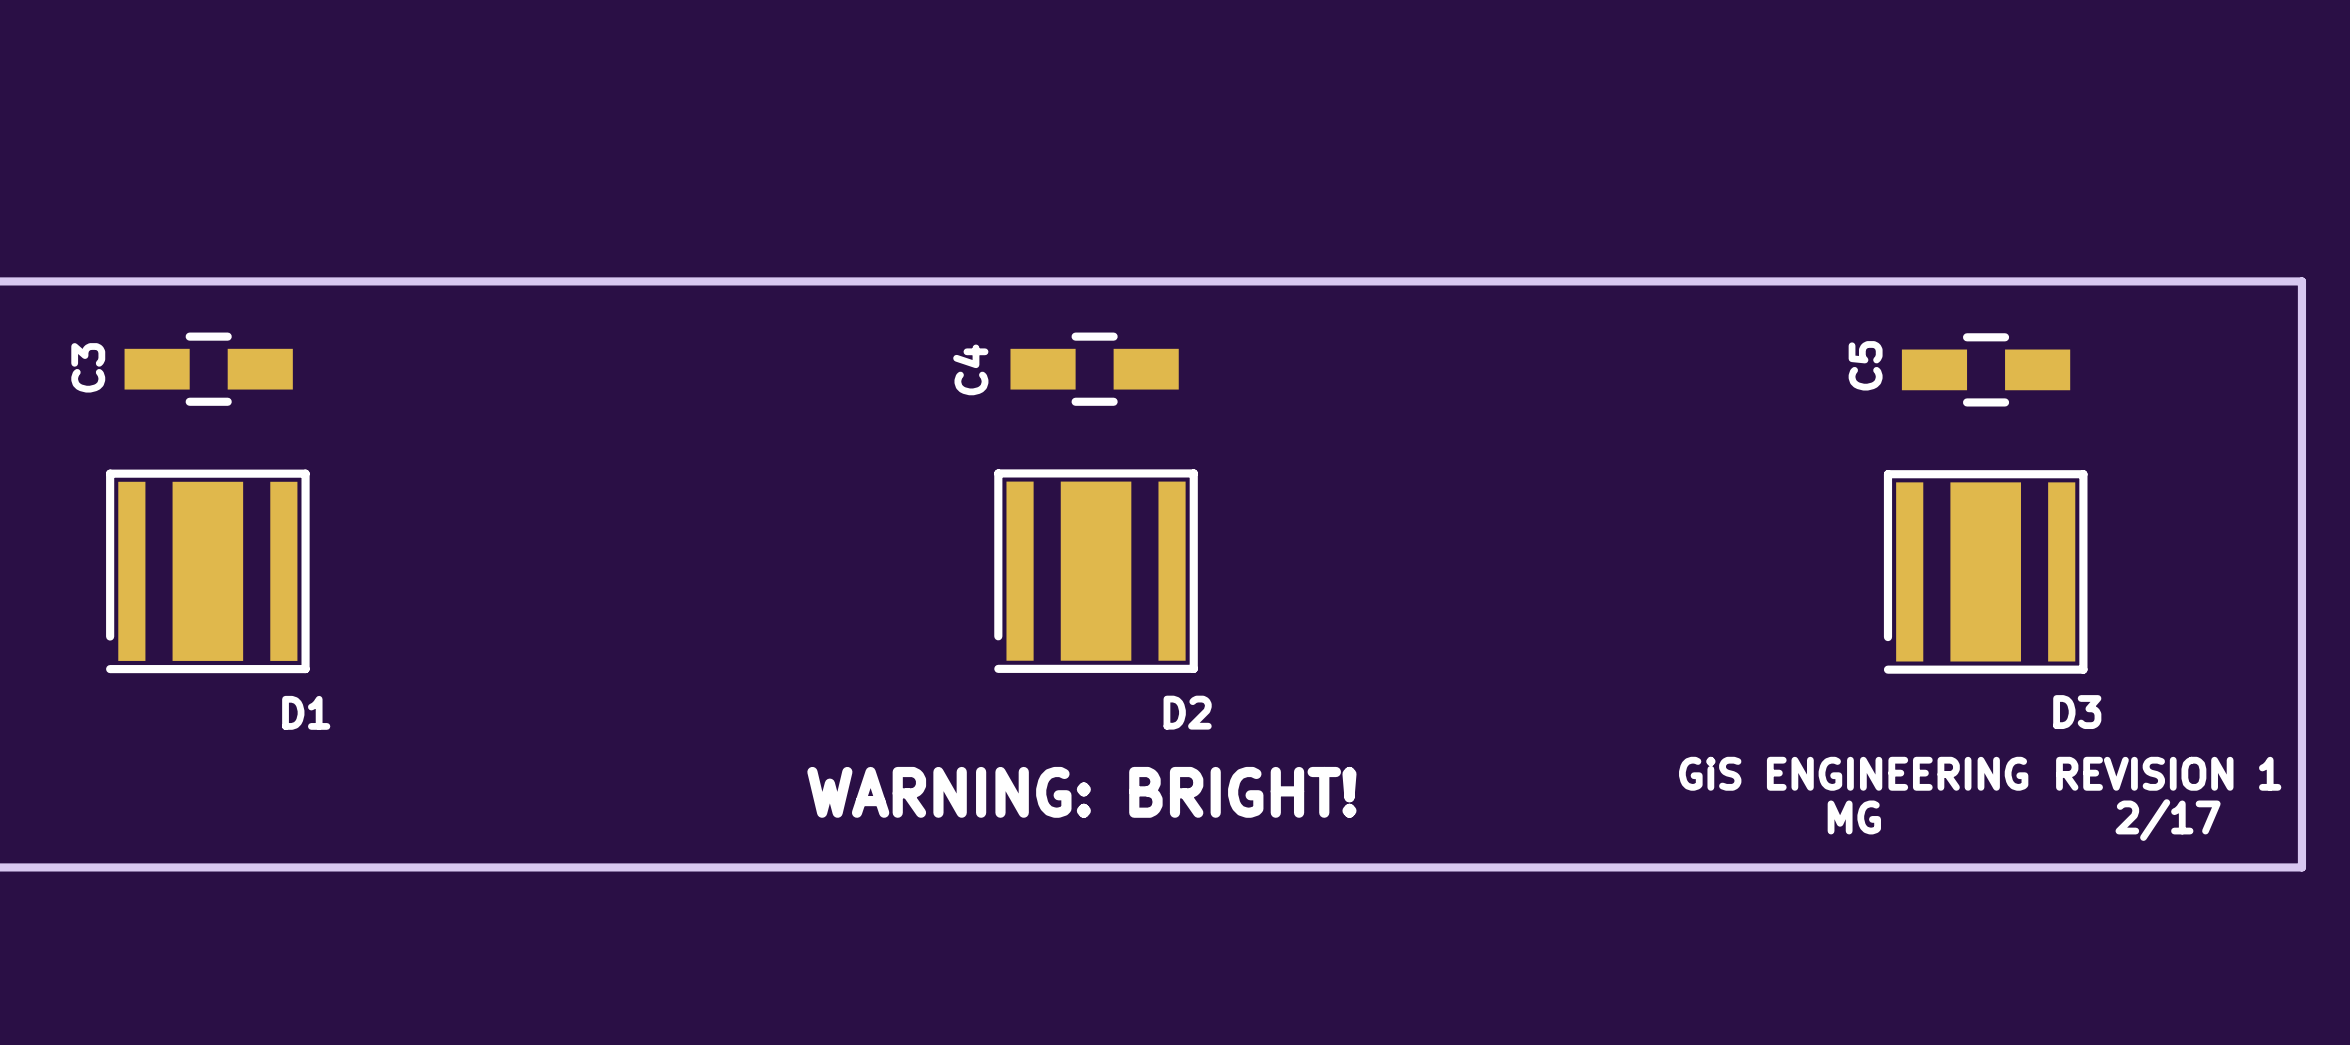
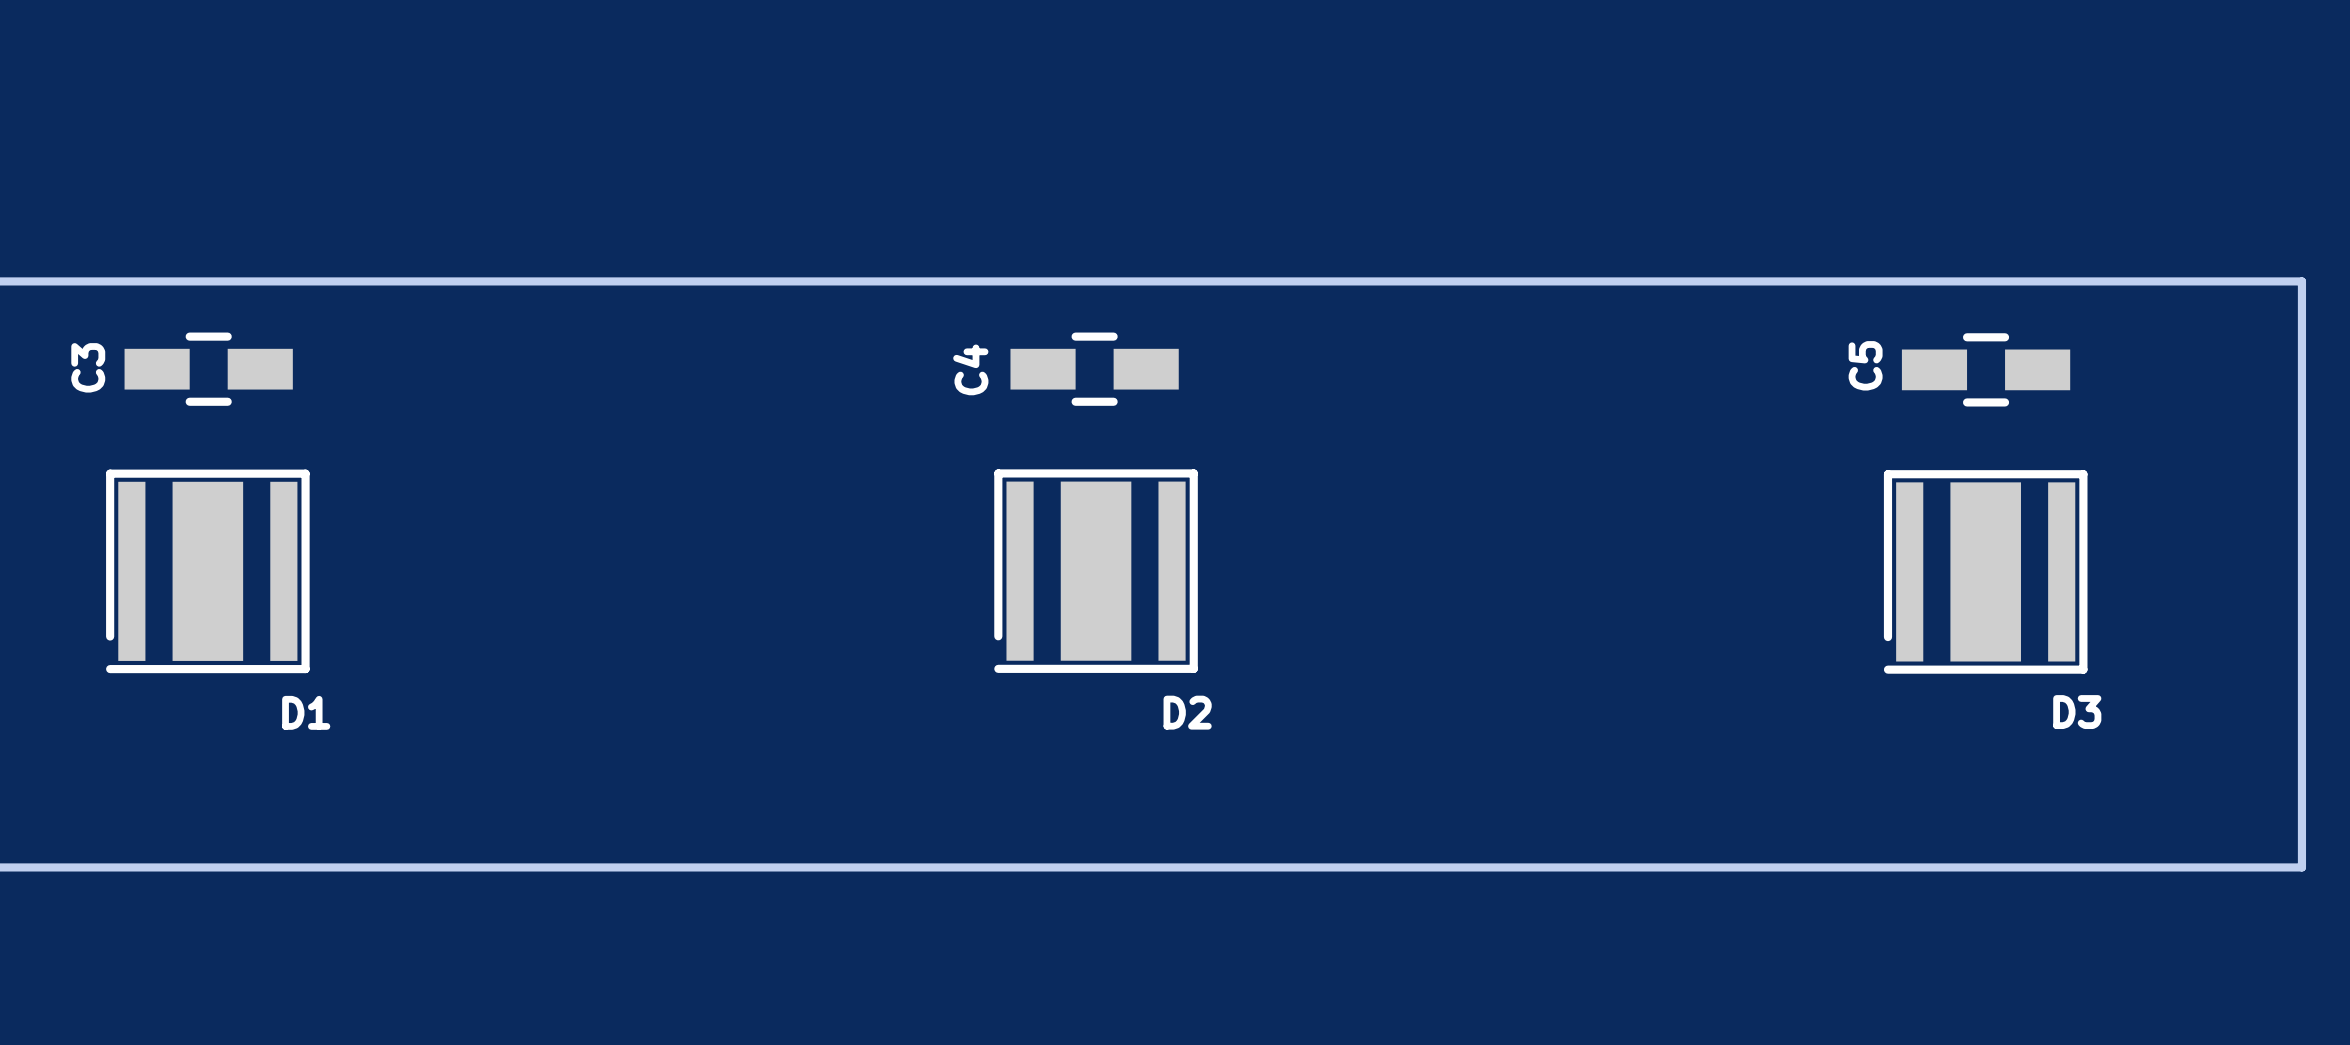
text: GiS ENGINEERING (1853, 773) -> none
text: REVISION 1 (2168, 773) -> none
text: WARNING: BRIGHT! (1081, 792) -> none
text: MG (1854, 817) -> none
text: 2/17 (2168, 820) -> none

